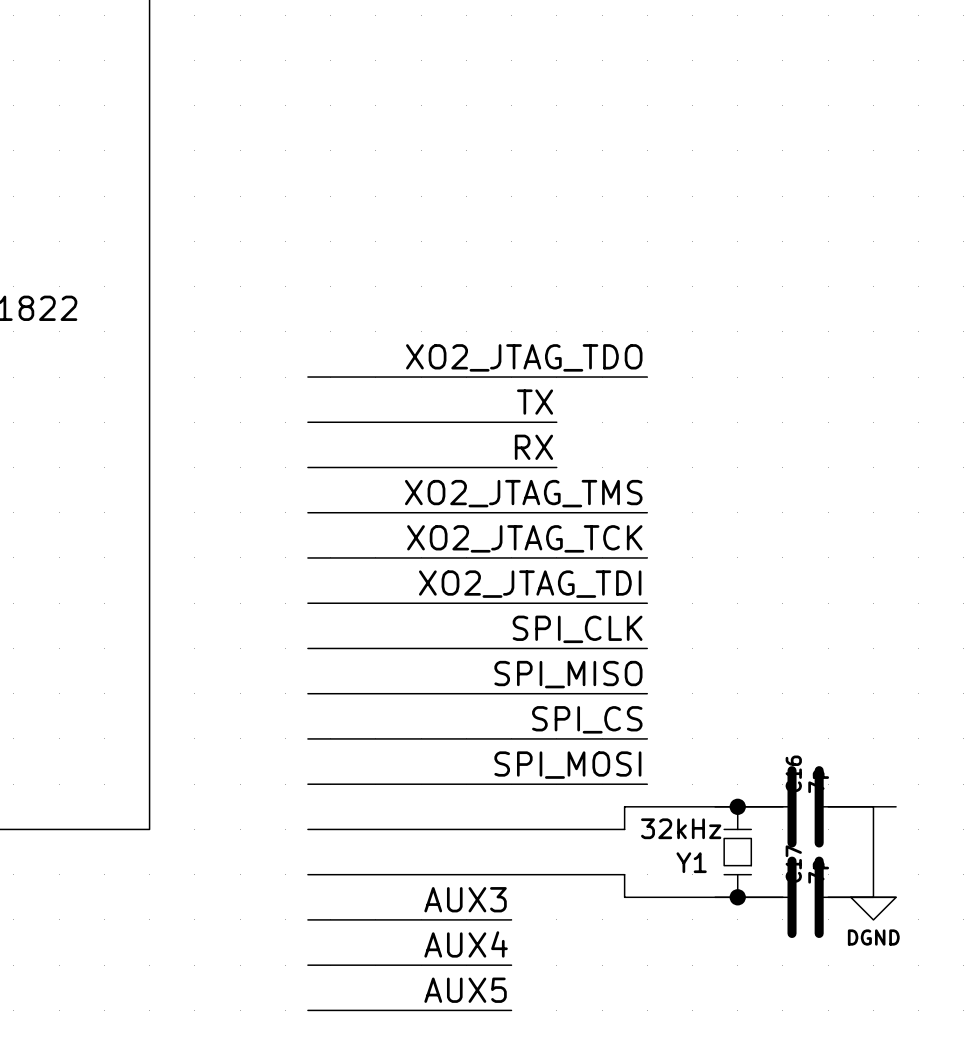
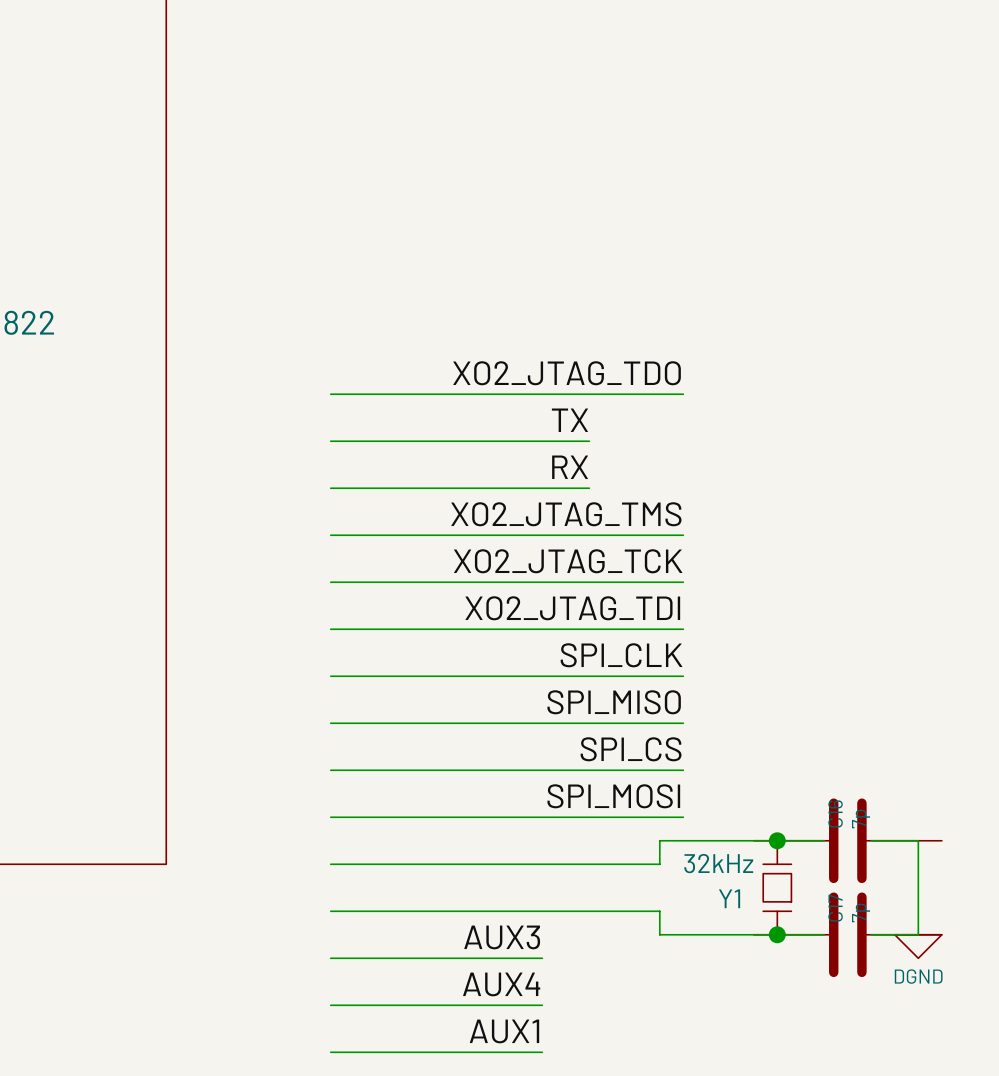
label: AUX5 (465, 990) -> AUX1 (504, 1031)

